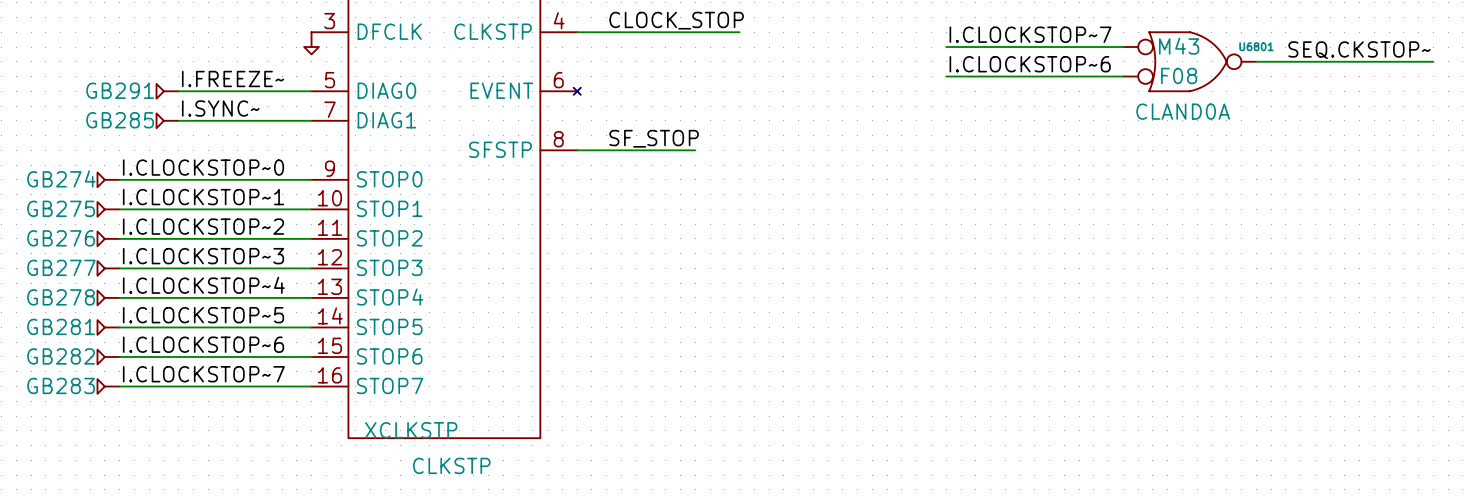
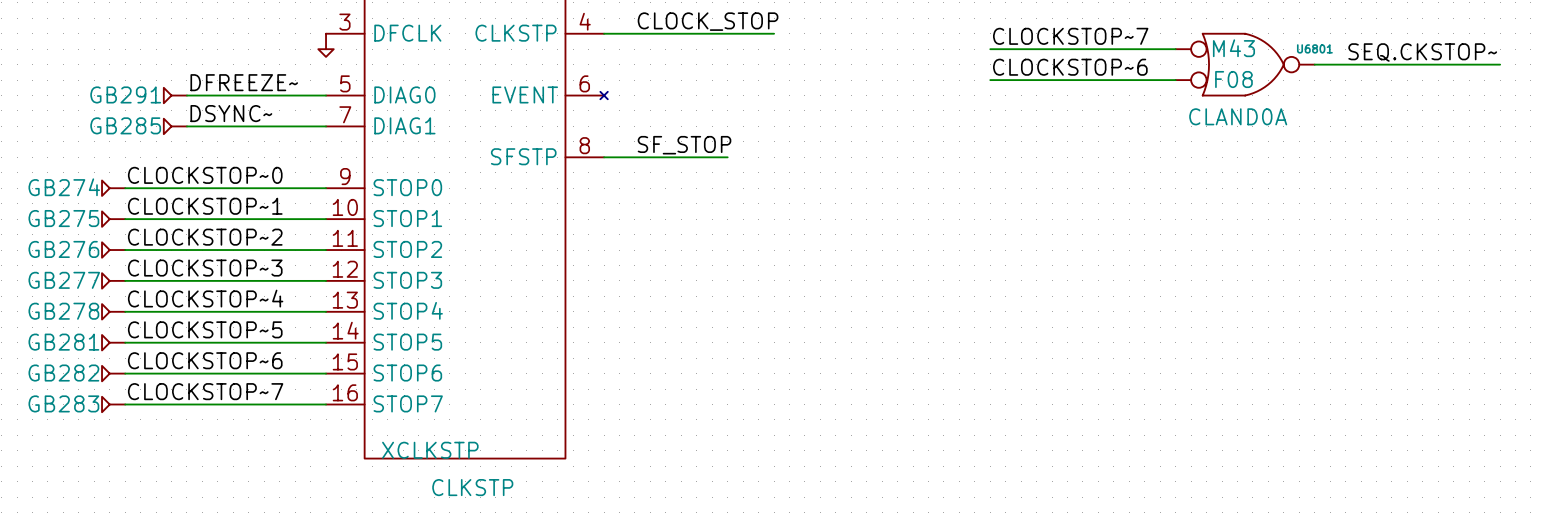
label: I.CLOCKSTOP~7 (1030, 34) -> CLOCKSTOP~7 (1070, 36)
label: I.CLOCKSTOP~6 (1030, 64) -> CLOCKSTOP~6 (1070, 67)
label: I.FREEZE~ (233, 79) -> DFREEZE~ (244, 82)
label: I.SYNC~ (220, 108) -> DSYNC~ (231, 113)
label: I.CLOCKSTOP~0 (203, 167) -> CLOCKSTOP~0 (205, 175)
label: I.CLOCKSTOP~1 (203, 197) -> CLOCKSTOP~1 (205, 206)
label: I.CLOCKSTOP~2 (203, 226) -> CLOCKSTOP~2 (205, 237)
label: I.CLOCKSTOP~3 (203, 256) -> CLOCKSTOP~3 (205, 268)
label: I.CLOCKSTOP~4 (203, 285) -> CLOCKSTOP~4 (205, 298)
label: I.CLOCKSTOP~5 (203, 315) -> CLOCKSTOP~5 (205, 329)
label: I.CLOCKSTOP~6 (203, 344) -> CLOCKSTOP~6 (205, 360)
label: I.CLOCKSTOP~7 (203, 374) -> CLOCKSTOP~7 (205, 391)

